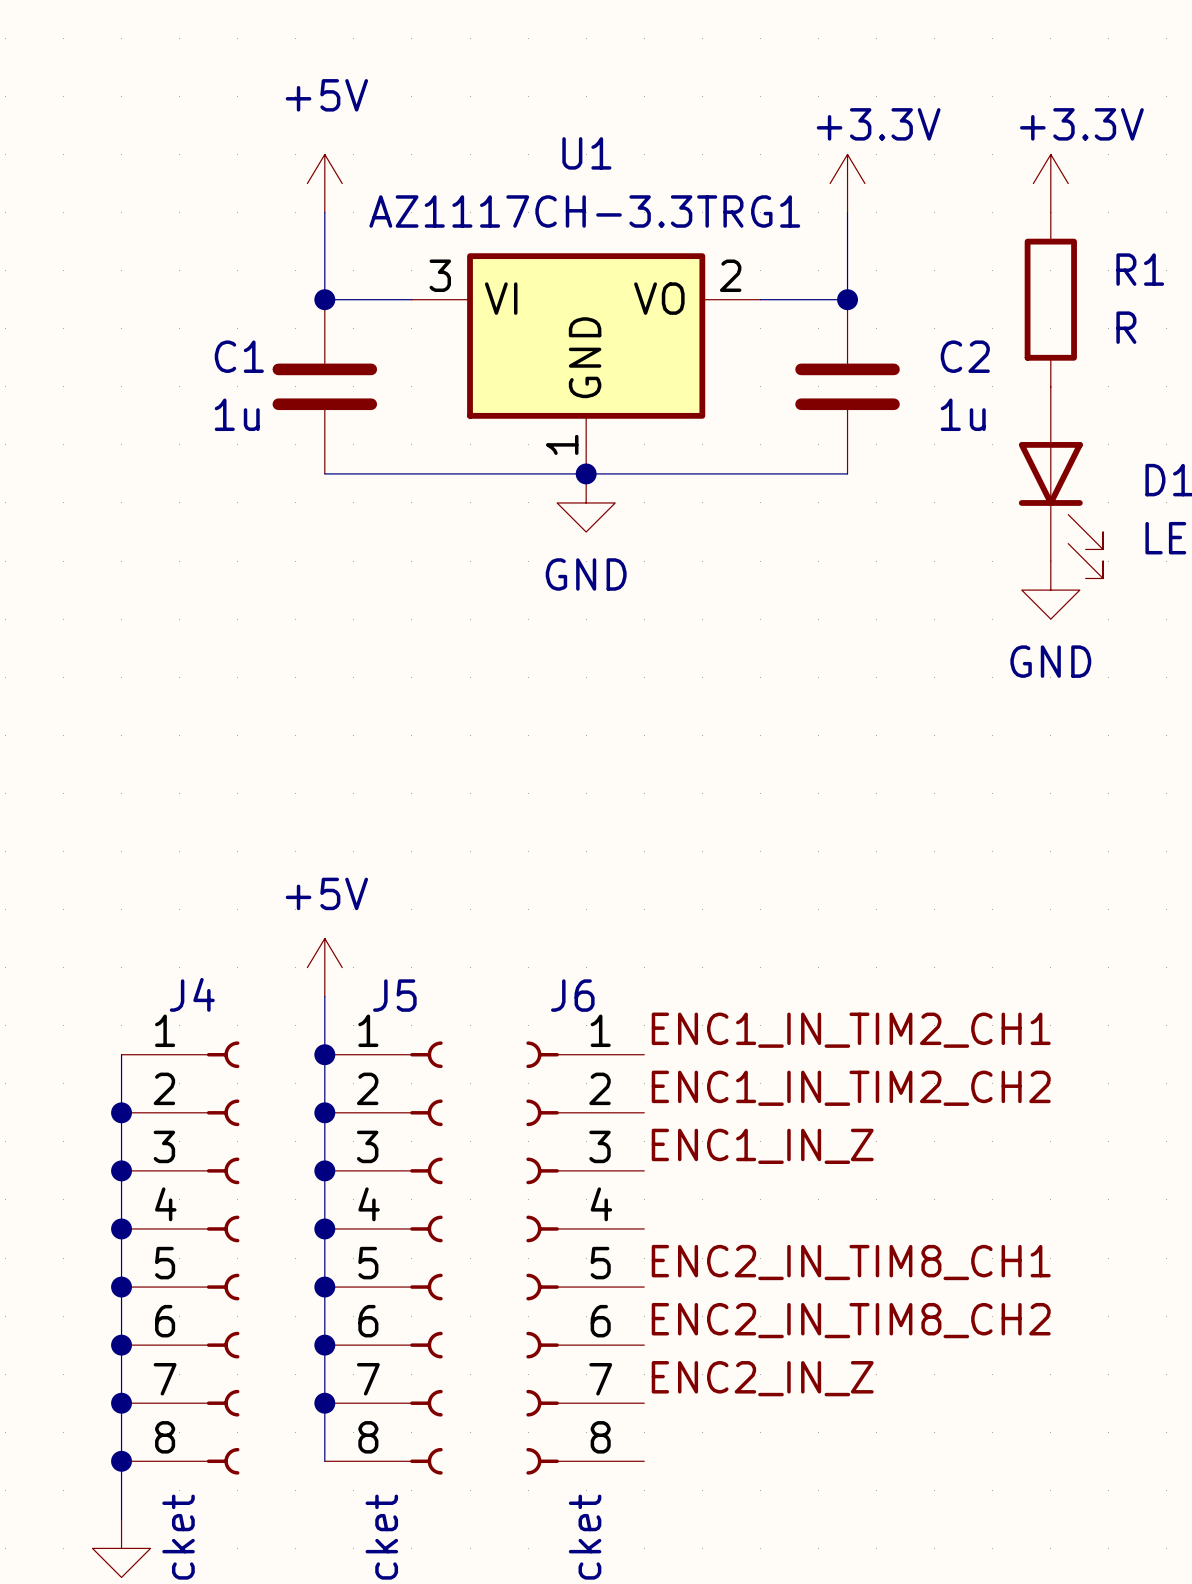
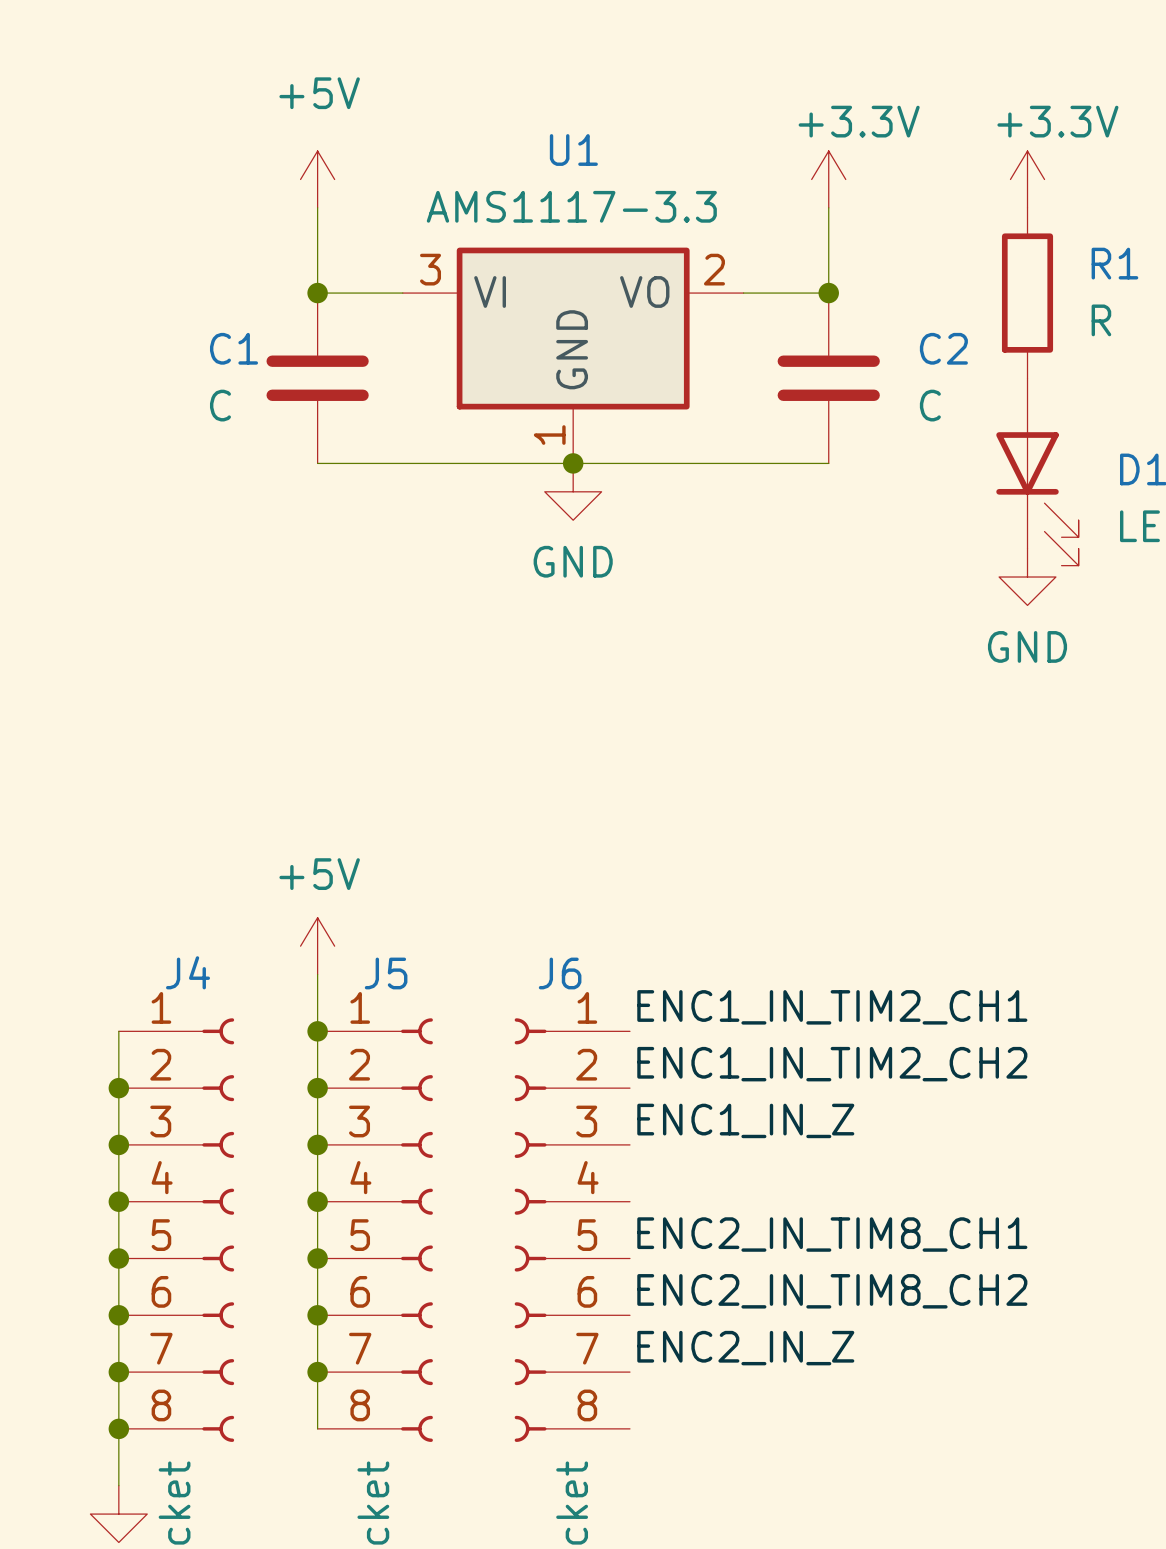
U1 value: AZ1117CH-3.3TRG1 (584, 211) -> AMS1117-3.3 (571, 206)
C1 value: 1u (237, 414) -> C (220, 405)
C2 value: 1u (963, 414) -> C (930, 405)

